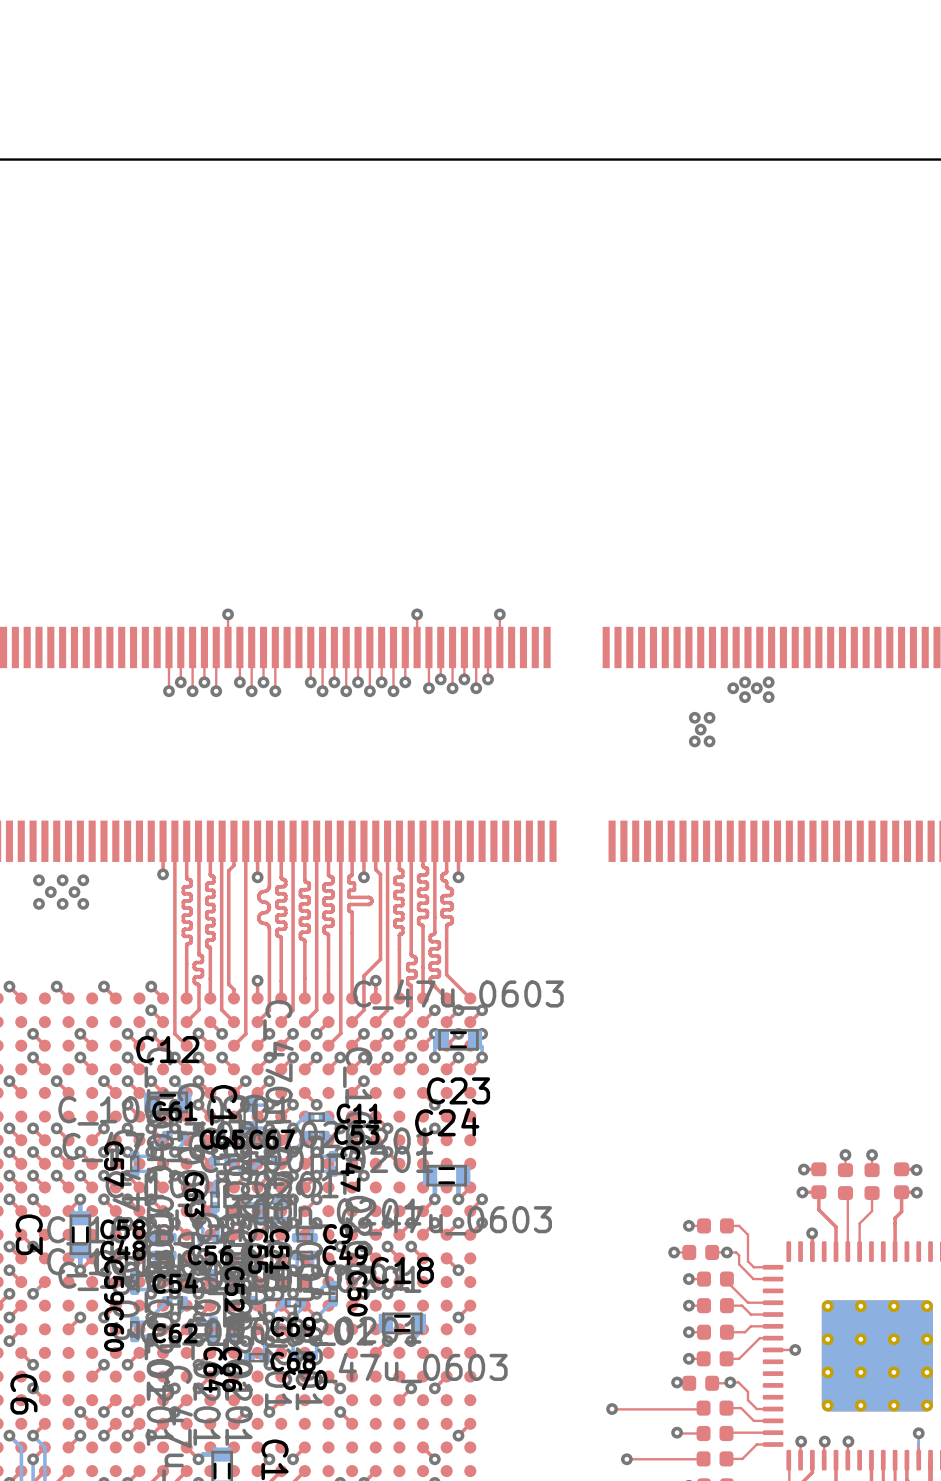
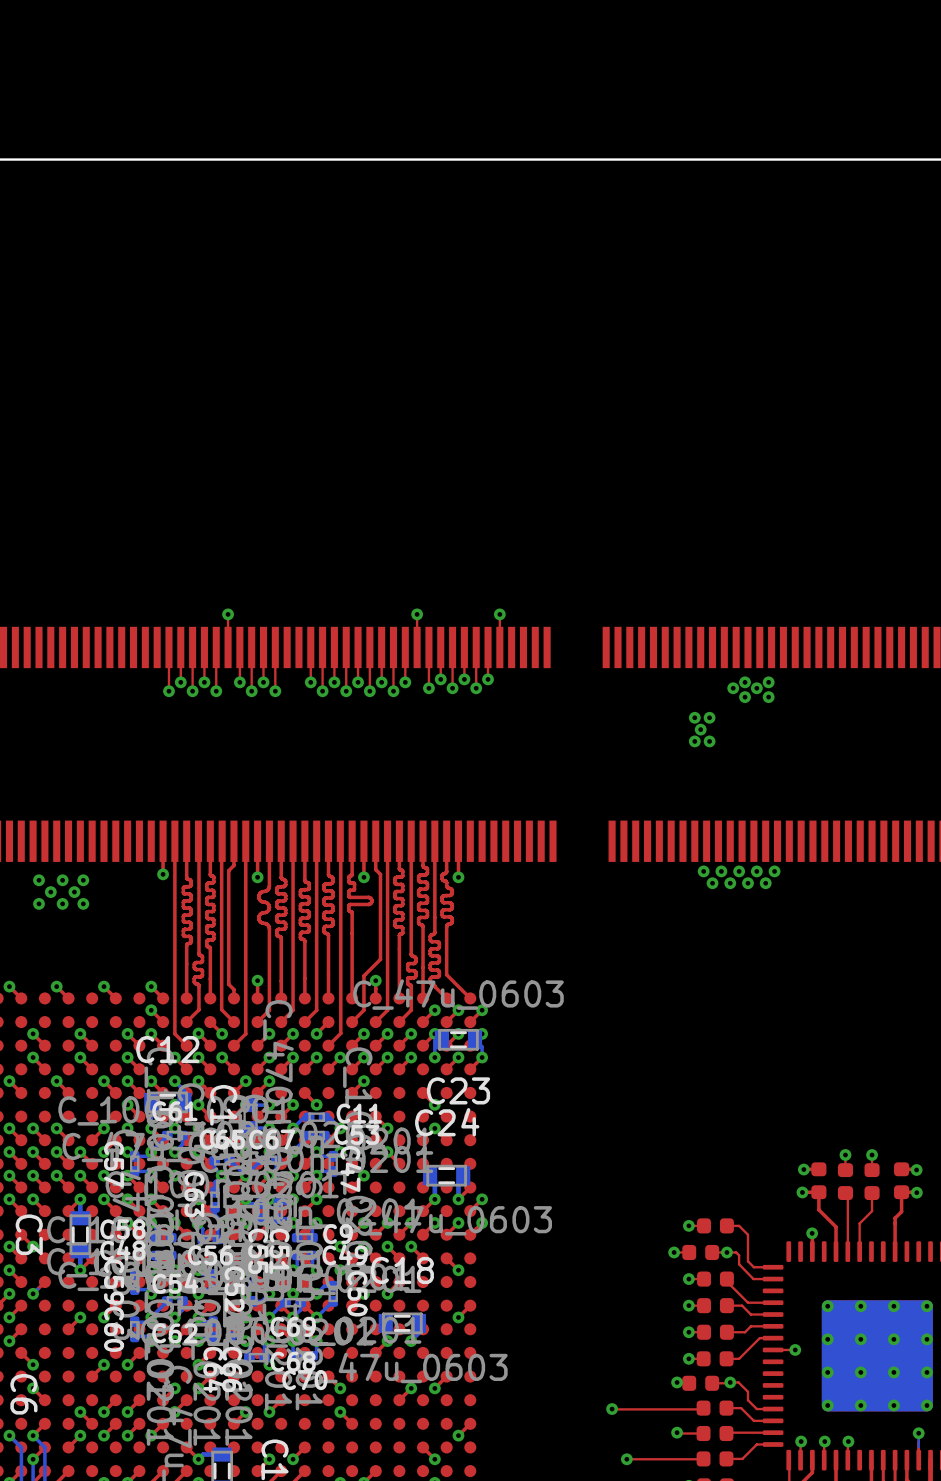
via: none -> (703, 871)
via: none -> (721, 871)
via: none -> (739, 871)
via: none -> (756, 871)
via: none -> (774, 871)
via: none -> (712, 883)
via: none -> (730, 883)
via: none -> (747, 883)
via: none -> (765, 883)

